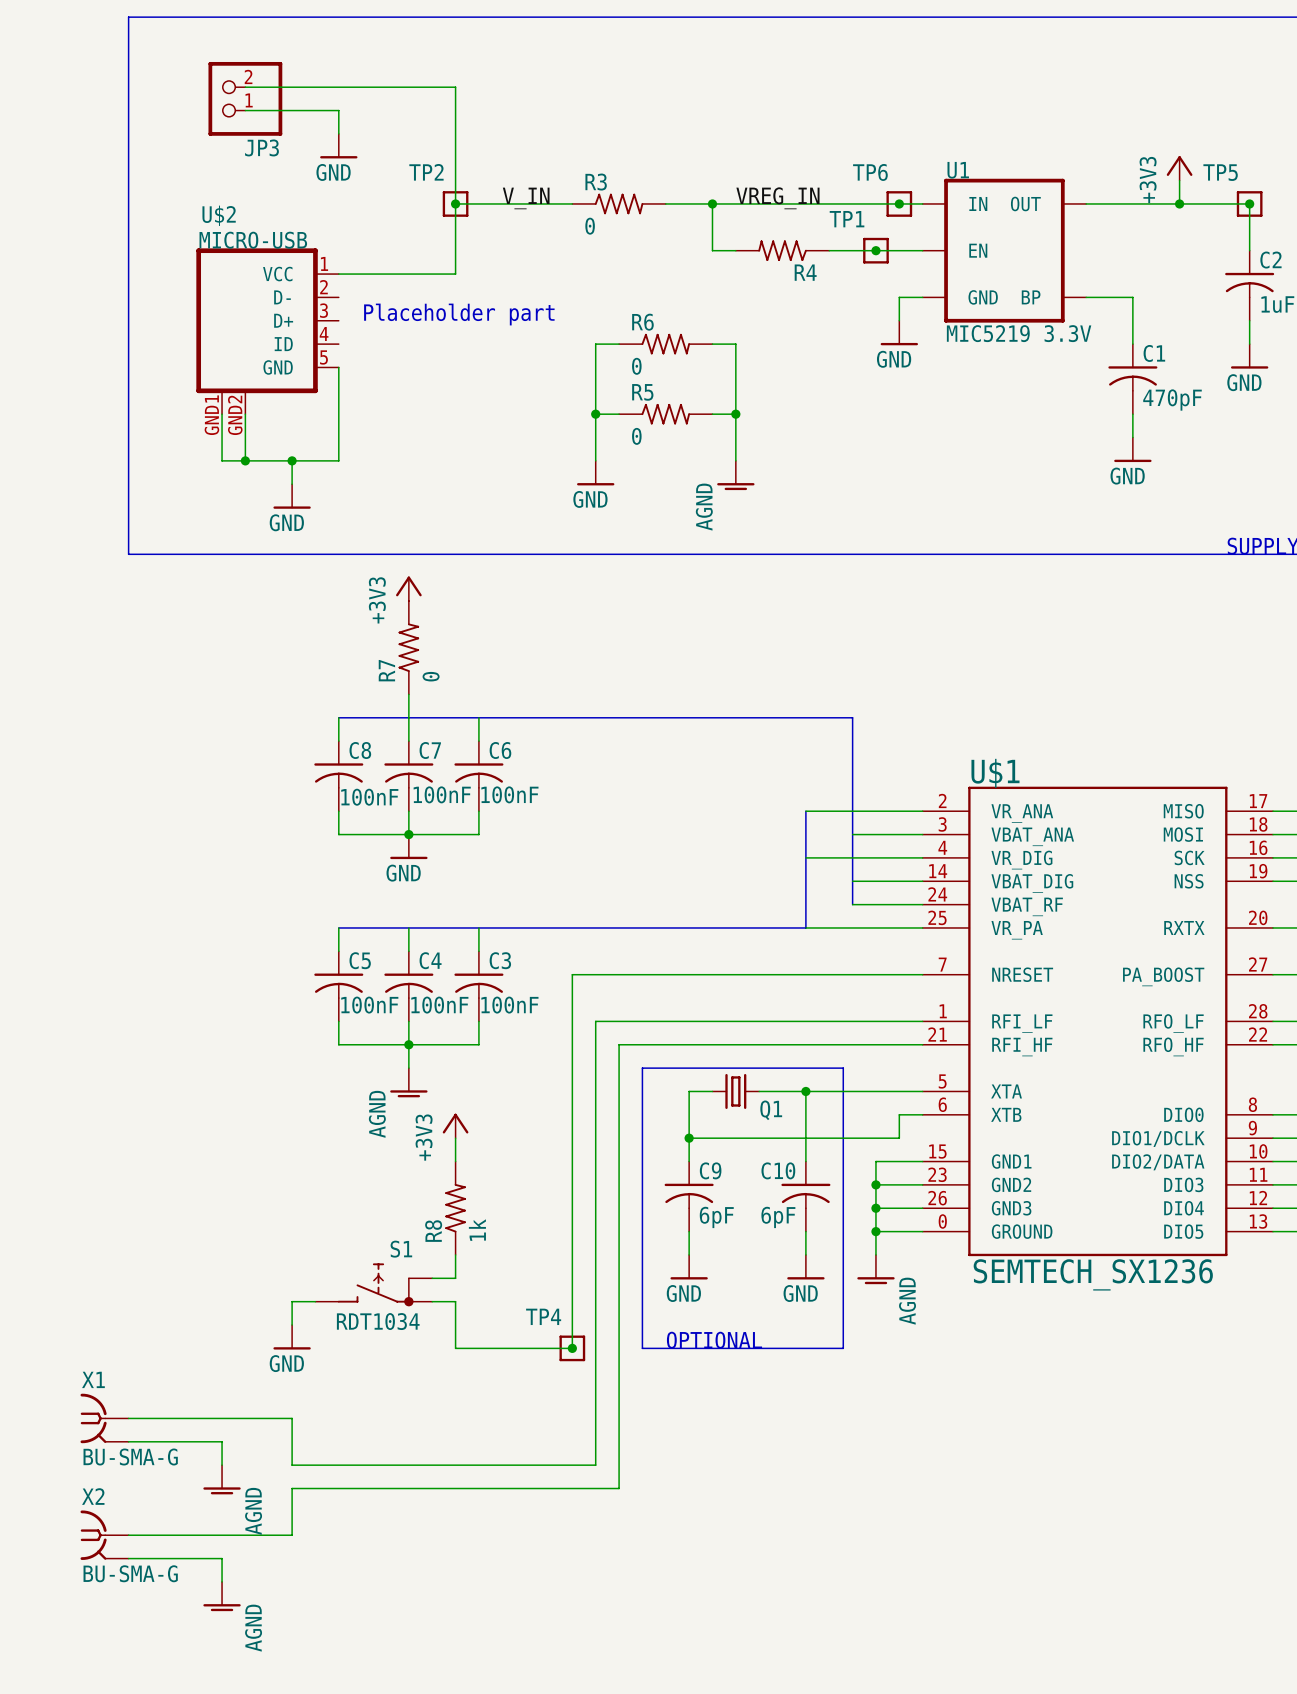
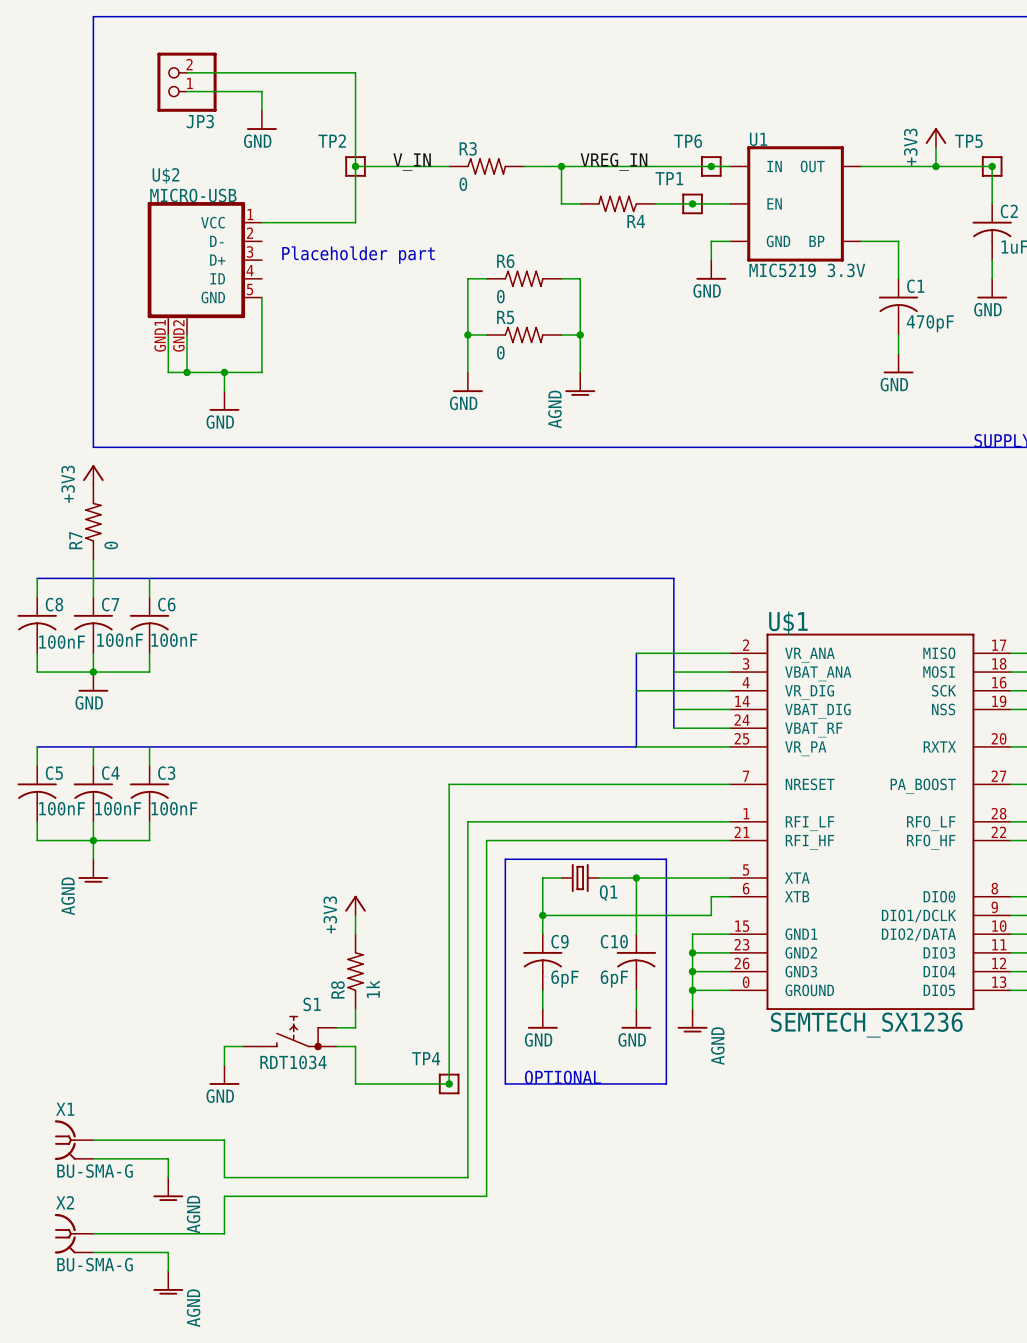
power symbol: none -> +3V3 (93, 474)
power symbol: +3V3 (408, 588) -> none
R7 position: (408, 647) -> (93, 522)
wire: none -> (93, 559) (93, 597)
wire: (408, 694) (408, 741) -> none
bus: none -> (37, 578) (261, 578)
wire: none -> (37, 578) (37, 597)
wire: (338, 717) (338, 741) -> (149, 578) (149, 597)
wire: (478, 717) (478, 741) -> none
C8 position: (338, 776) -> (37, 625)
C7 position: (408, 776) -> (93, 625)
C6 position: (478, 776) -> (149, 625)
wire: none -> (37, 653) (37, 672) (149, 672) (149, 653)
wire: none -> (93, 653) (93, 672)
wire: (338, 811) (338, 834) (478, 834) (478, 811) -> none
wire: (408, 811) (408, 834) -> none
junction: none -> (93, 672)
junction: (408, 834) -> none
power symbol: none -> GND (93, 681)
power symbol: GND (408, 846) -> none
bus: none -> (37, 746) (261, 746)
wire: none -> (37, 746) (37, 765)
wire: none -> (93, 746) (93, 765)
wire: (338, 927) (338, 951) -> (149, 746) (149, 765)
wire: (408, 927) (408, 951) -> none
wire: (478, 927) (478, 951) -> none
C5 position: (338, 986) -> (37, 793)
C4 position: (408, 986) -> (93, 793)
C3 position: (478, 986) -> (149, 793)
wire: none -> (37, 821) (37, 840) (149, 840) (149, 821)
wire: none -> (93, 821) (93, 859)
wire: (338, 1021) (338, 1044) (478, 1044) (478, 1021) -> none
wire: (408, 1021) (408, 1068) -> none
junction: none -> (93, 840)
junction: (408, 1044) -> none
power symbol: none -> AGND (93, 870)
power symbol: AGND (408, 1082) -> none

